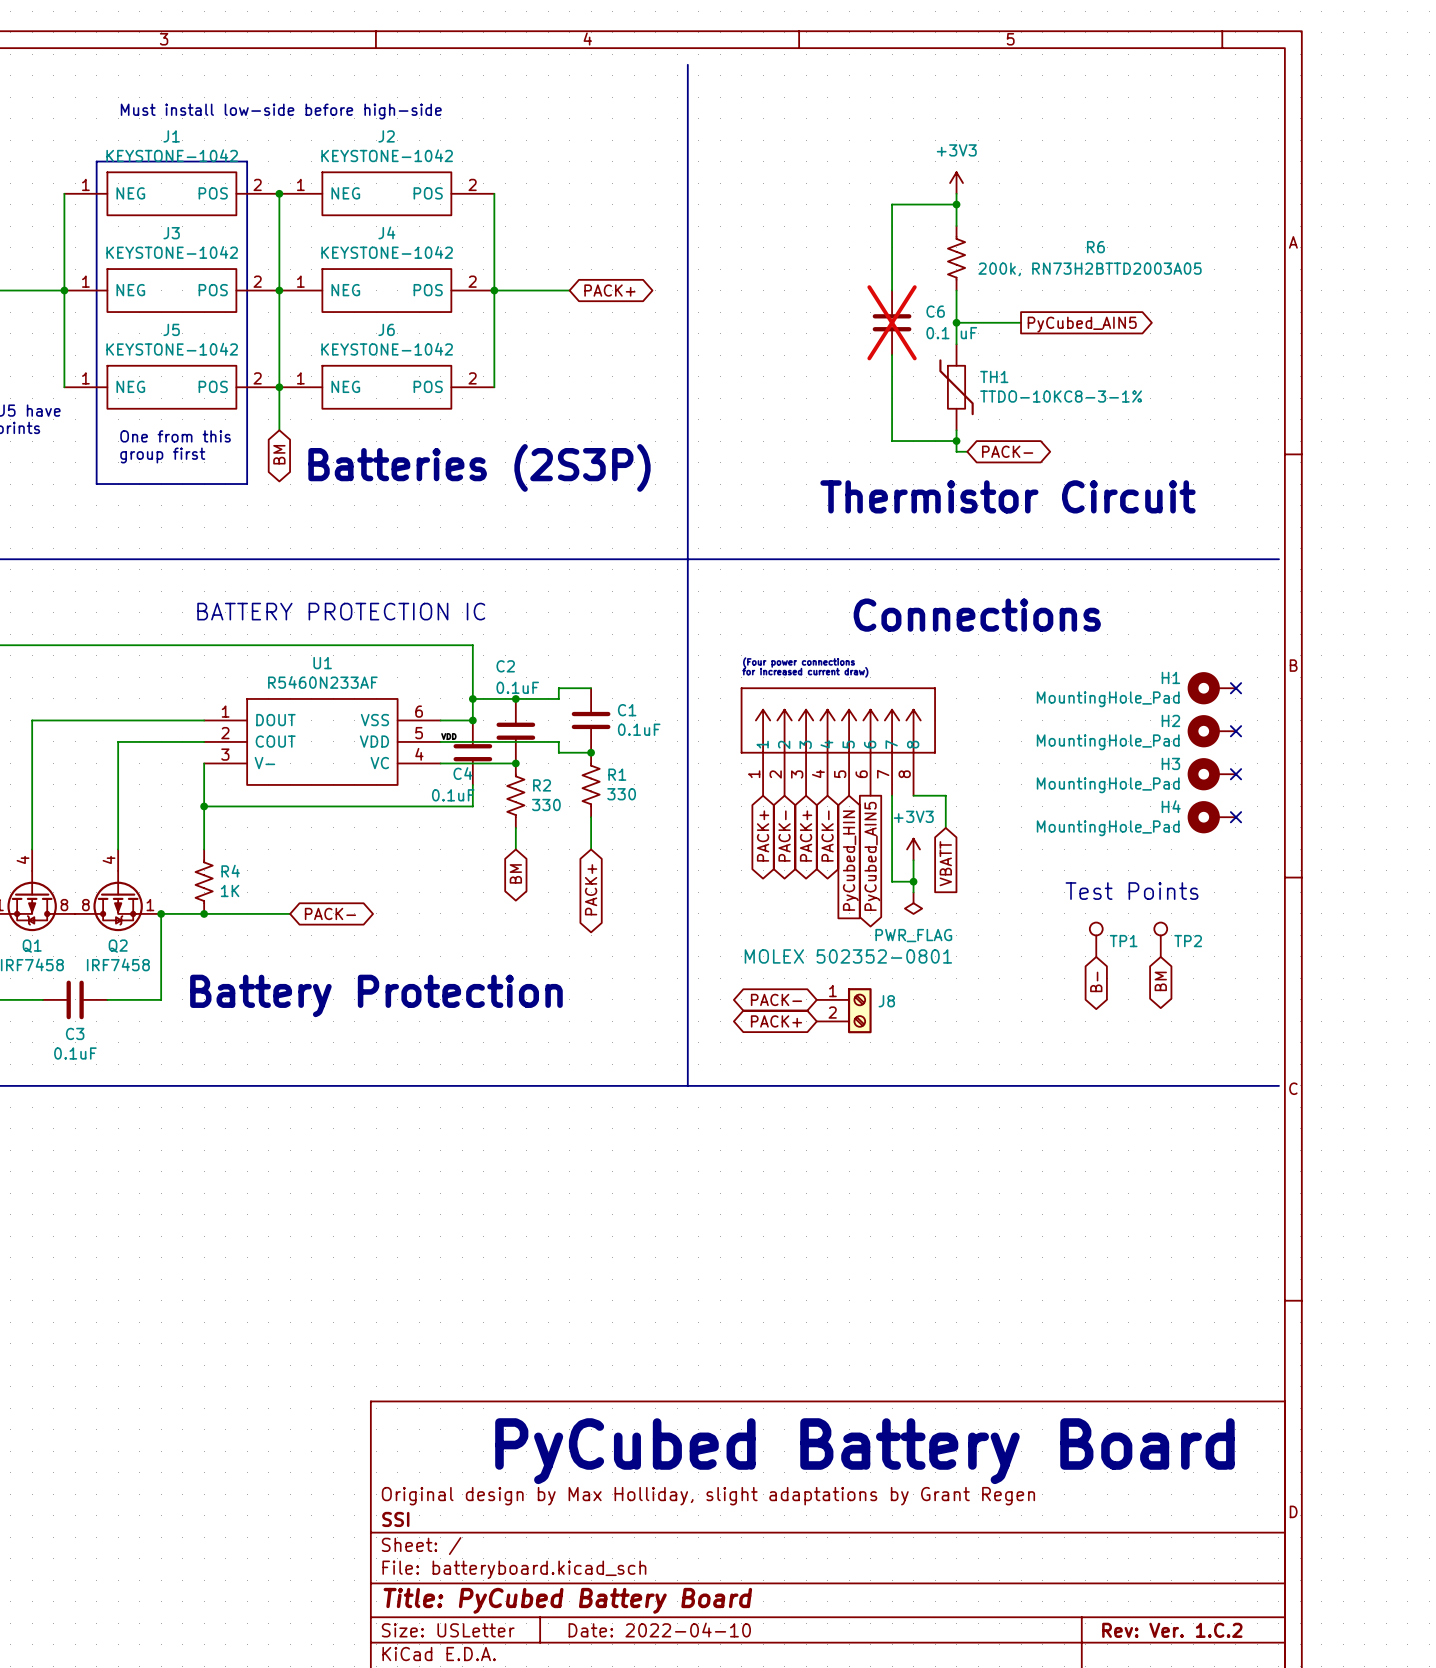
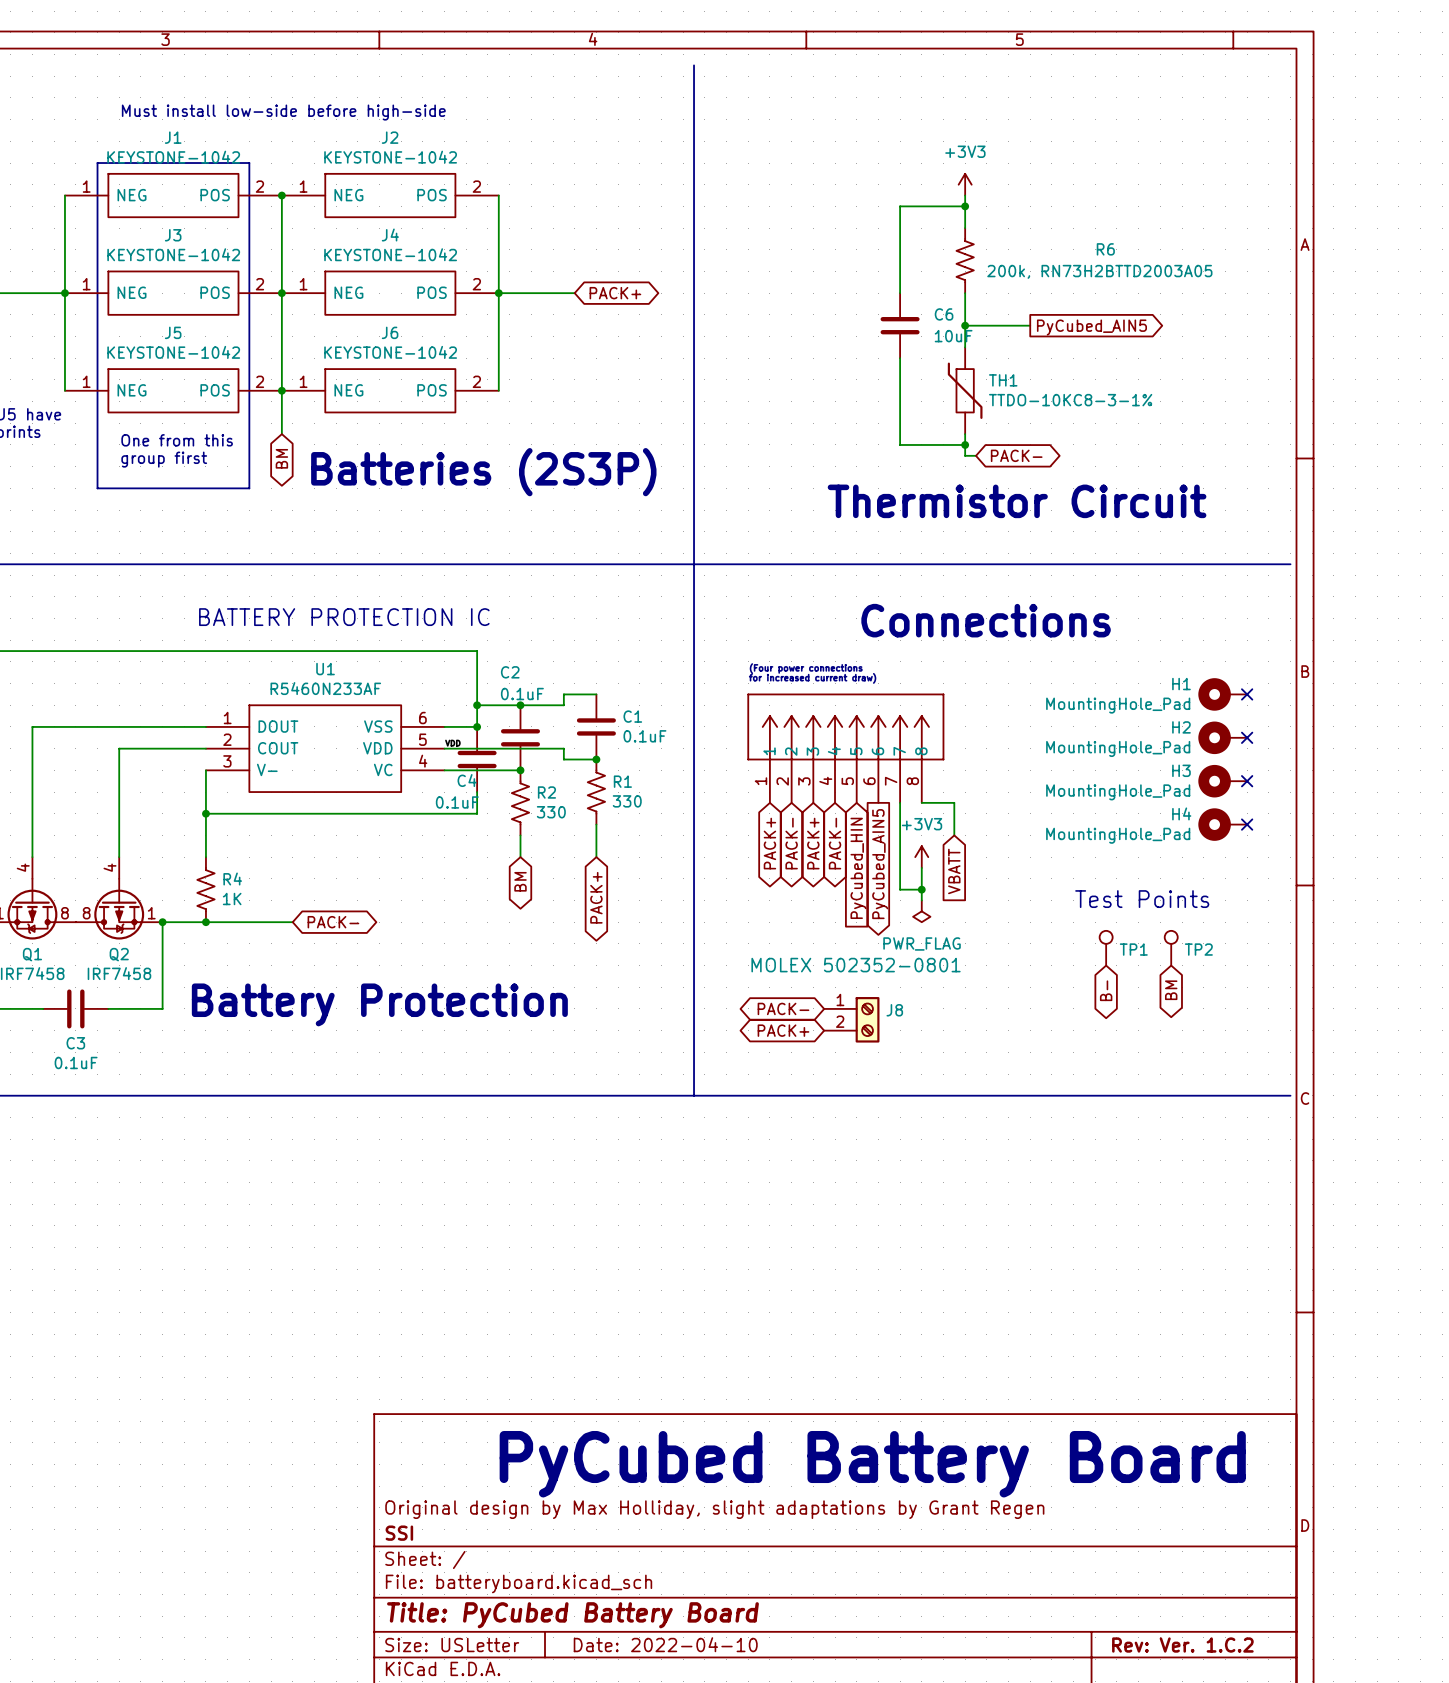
C6 do-not-place cross: (892, 322) -> none
C6 value: 0.1 uF (951, 333) -> 10uF (953, 336)

